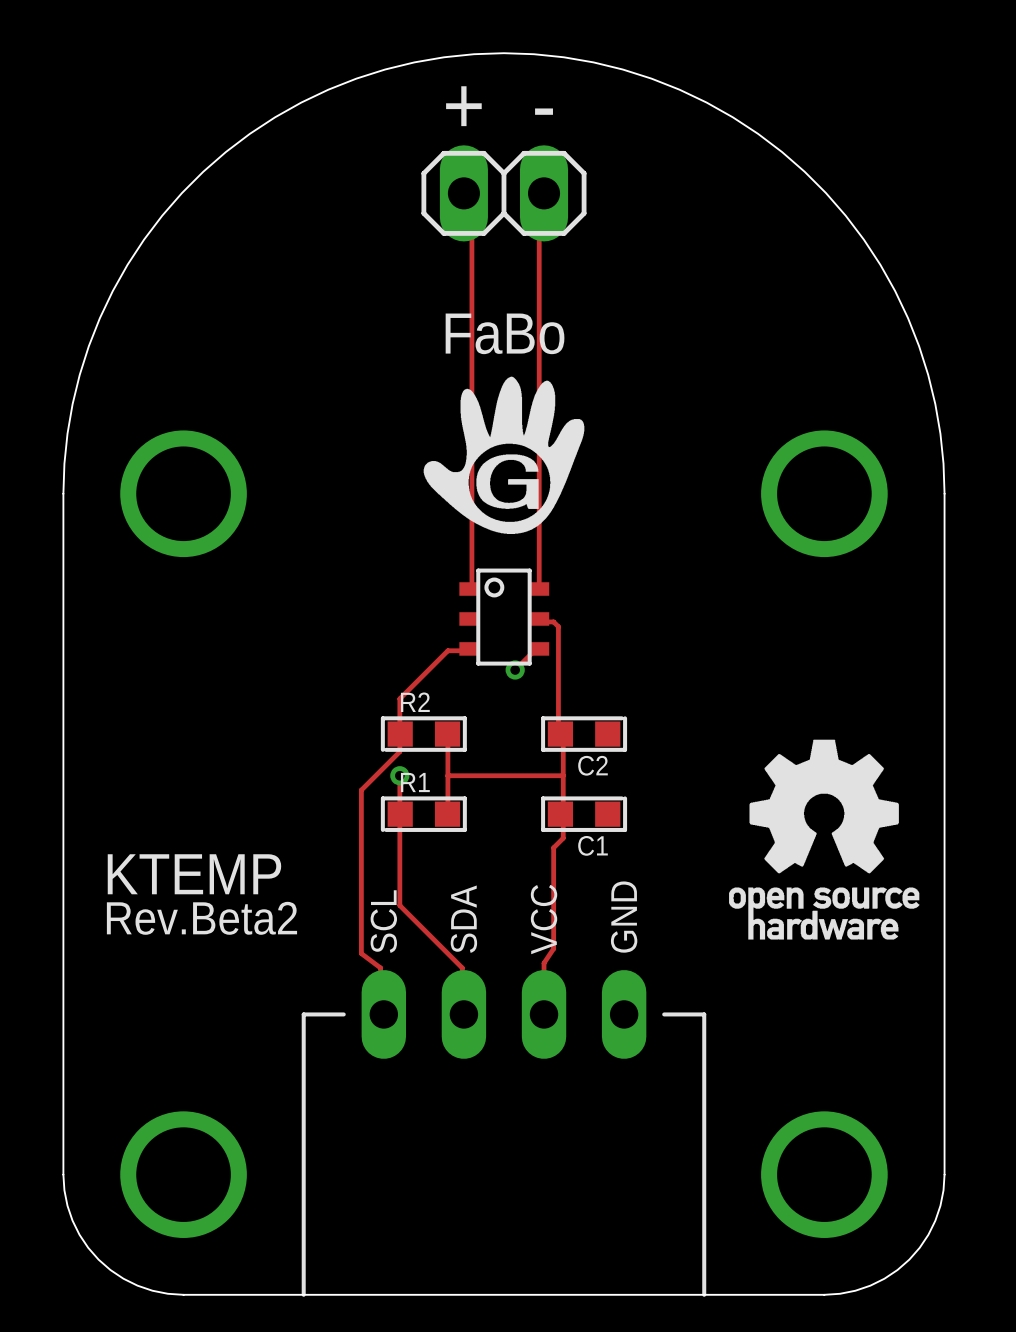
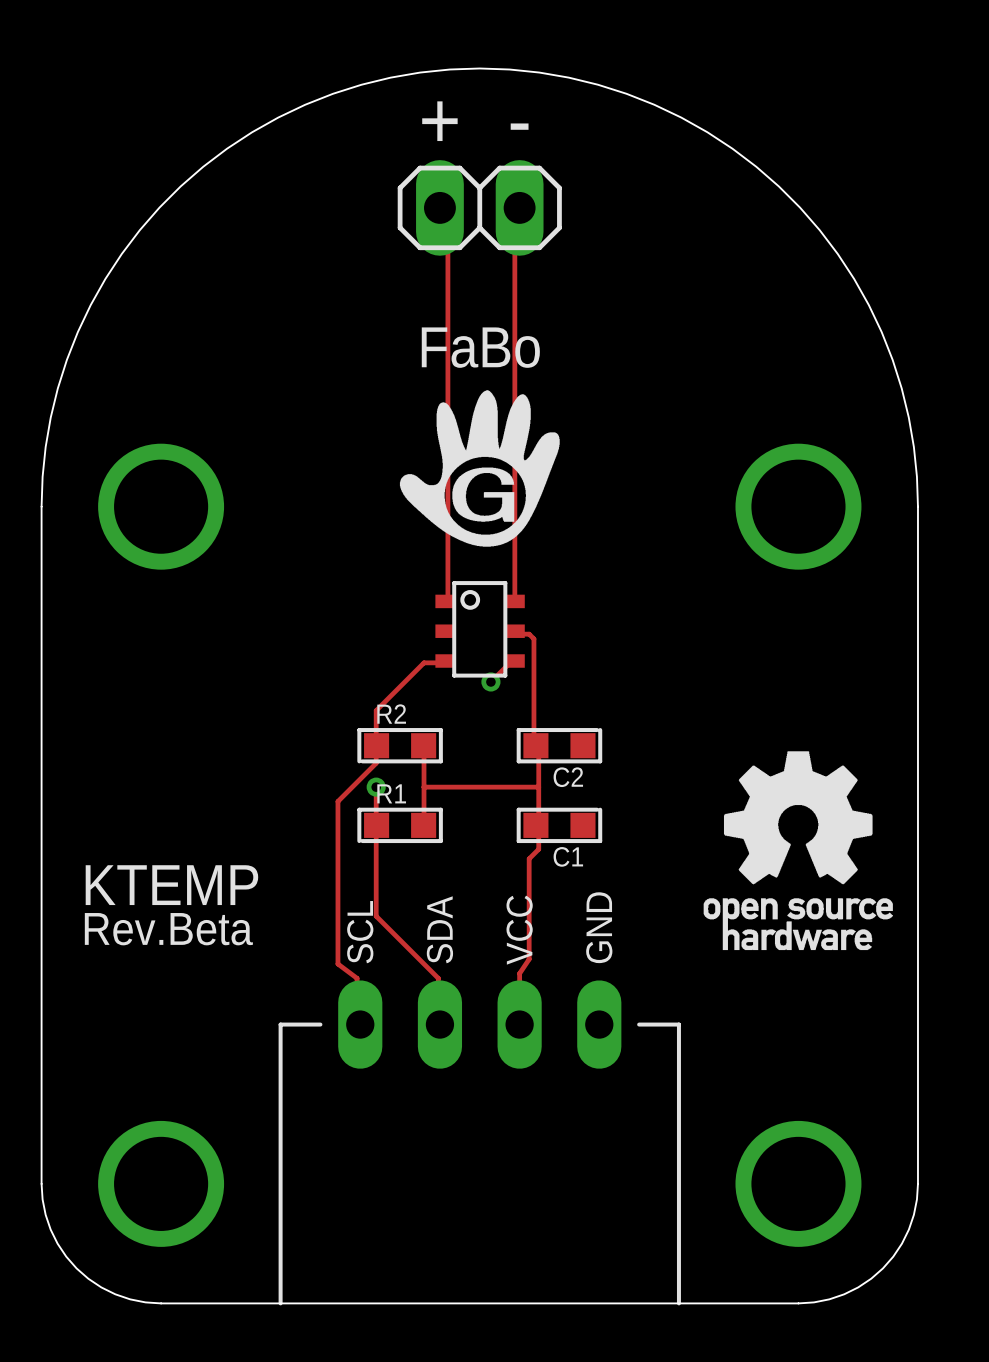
text: Rev.Beta2 (201, 918) -> Rev.Beta (168, 929)

